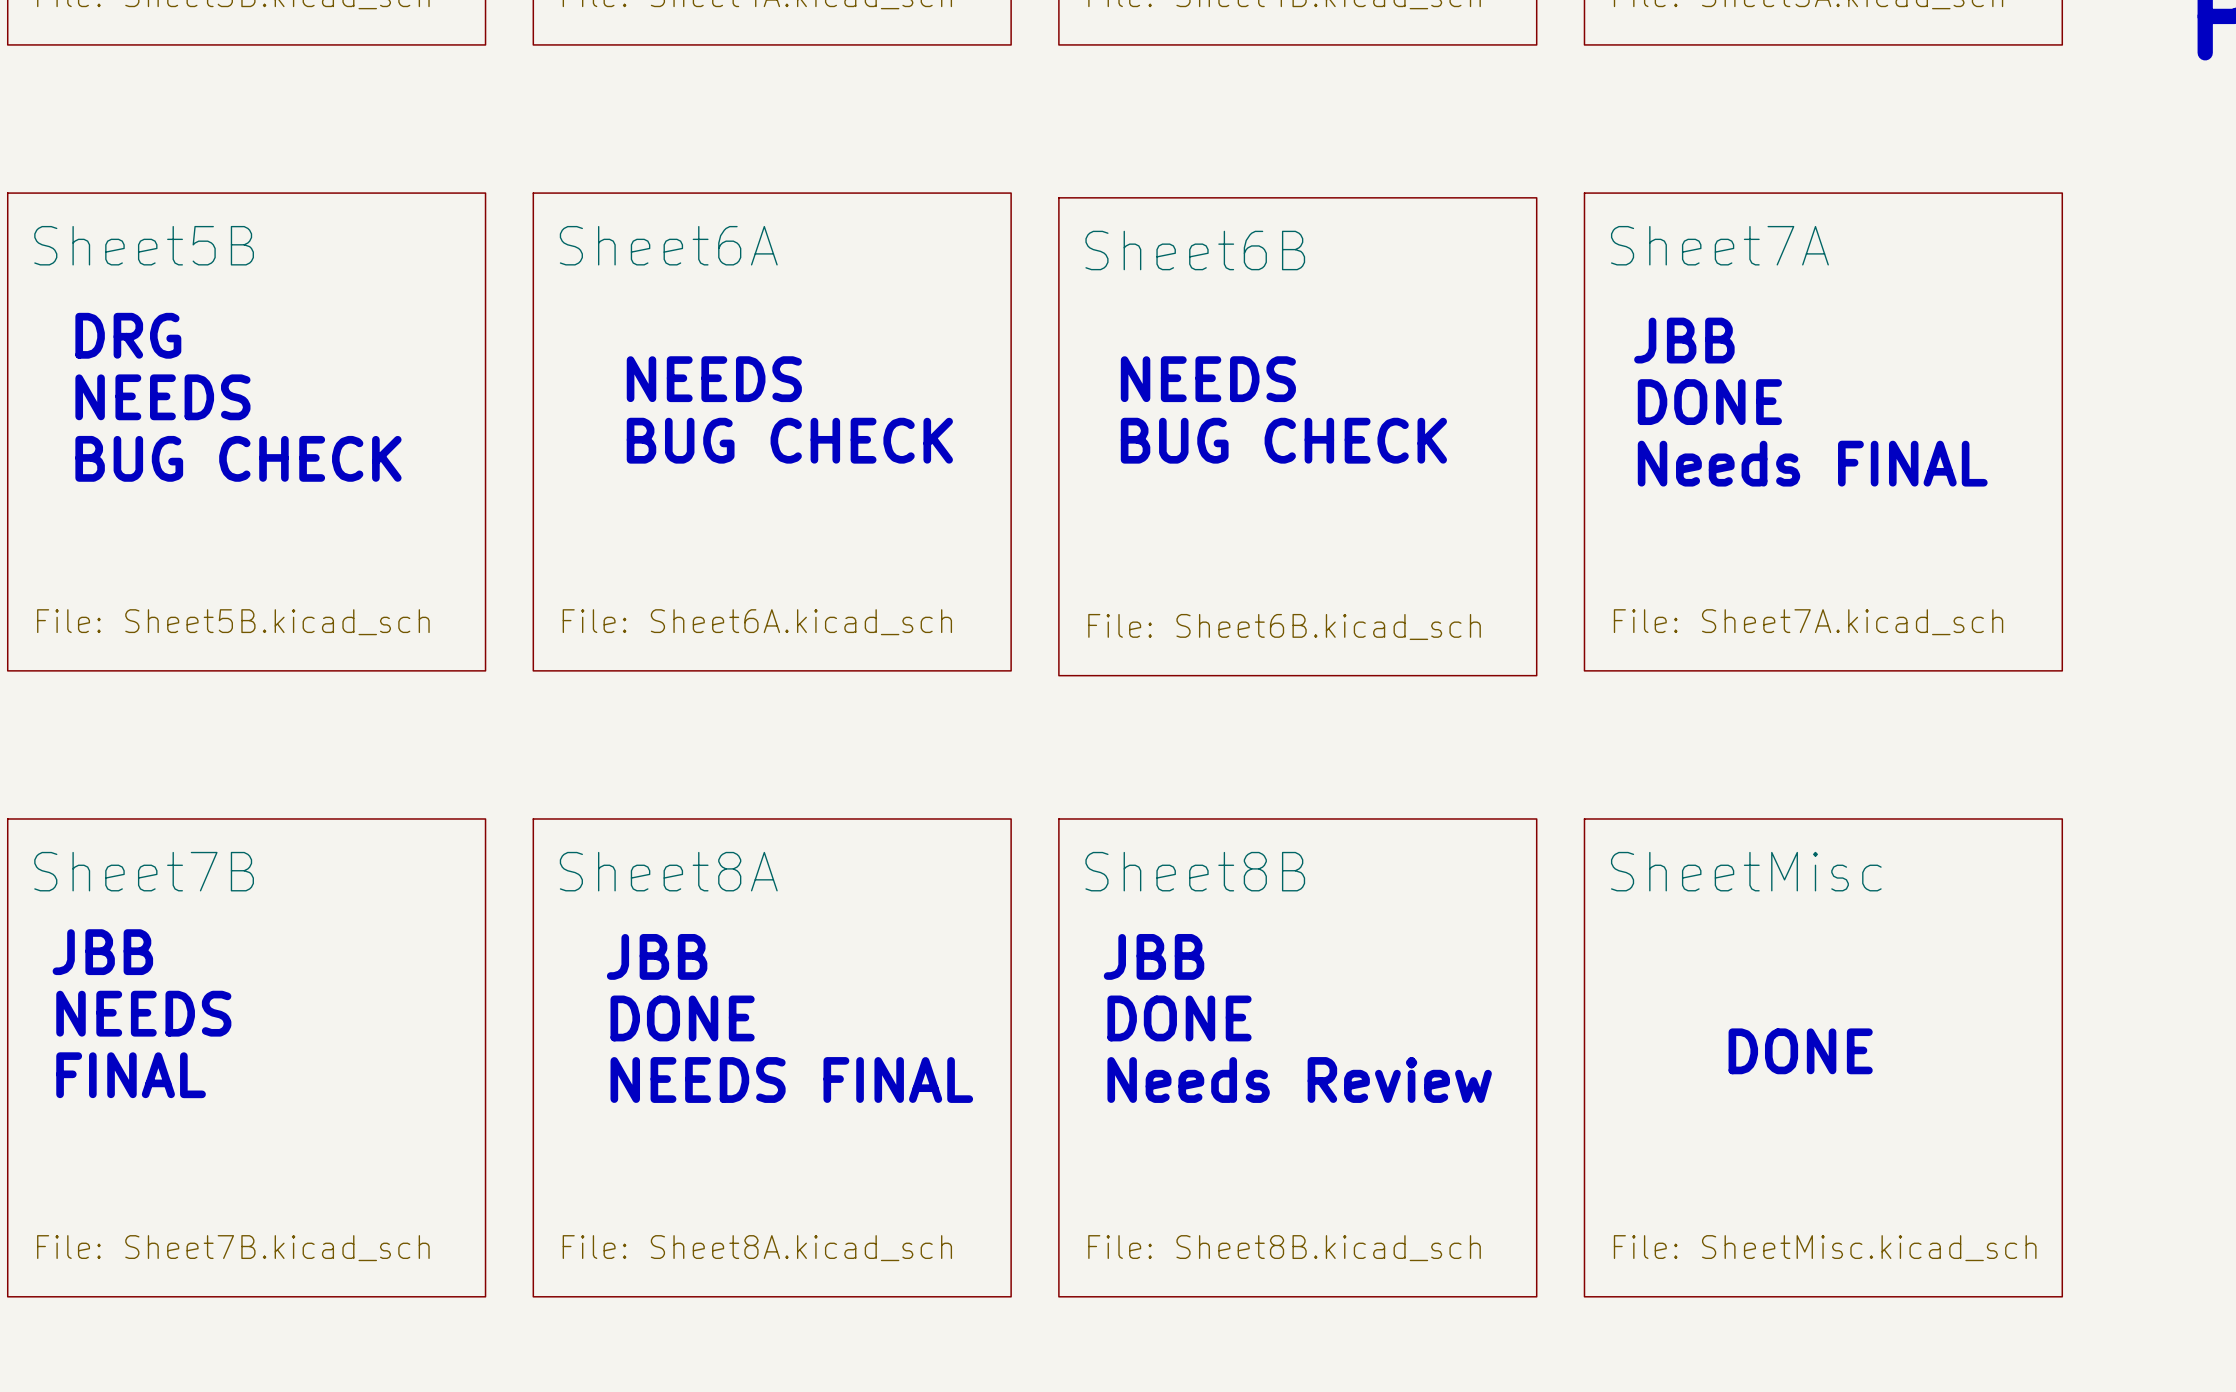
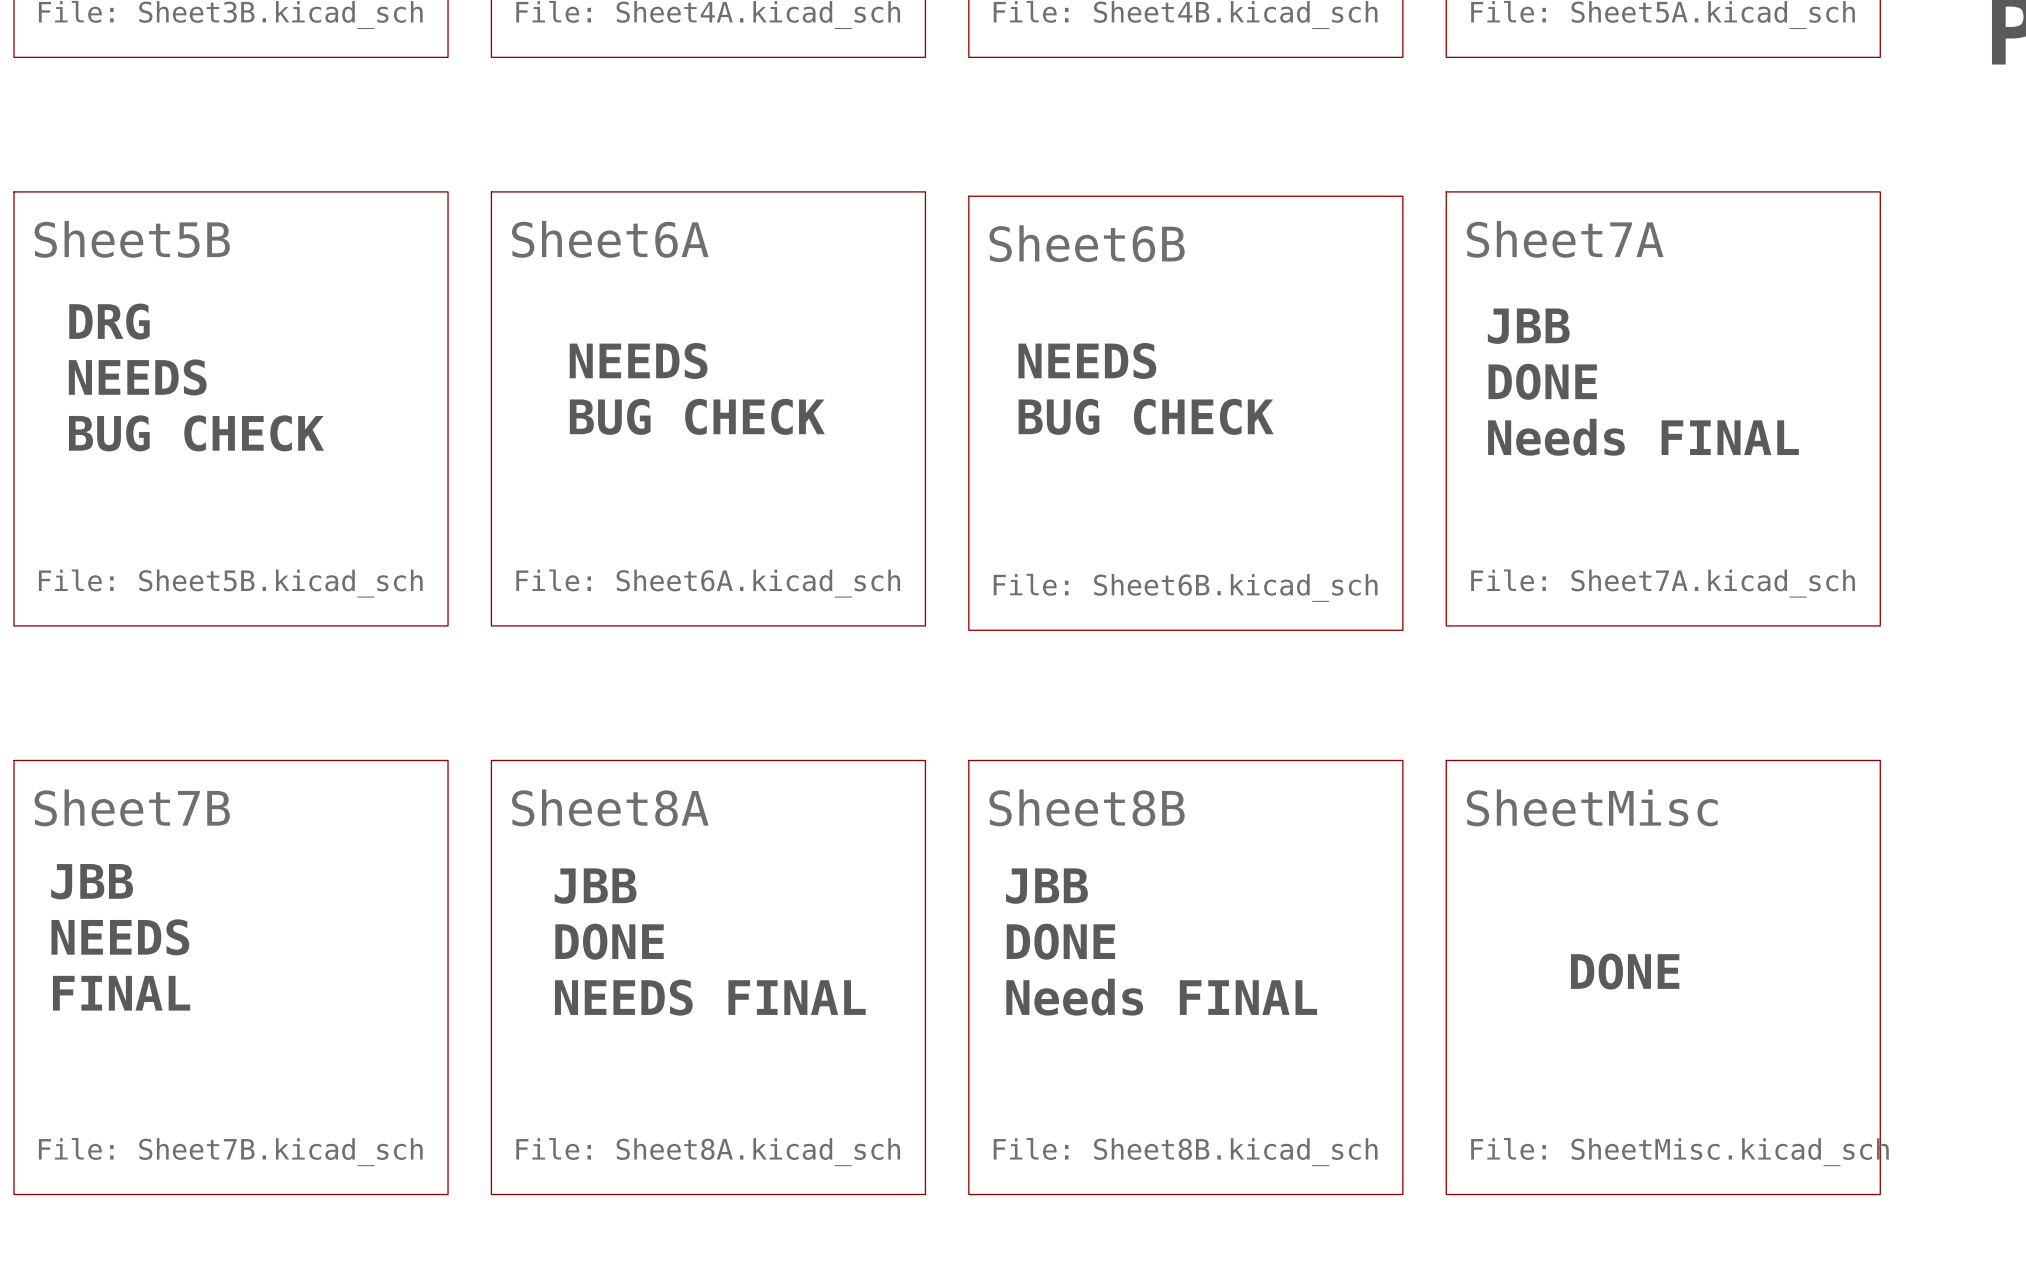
text: Needs Review (1299, 1080) -> Needs FINAL (1161, 997)

